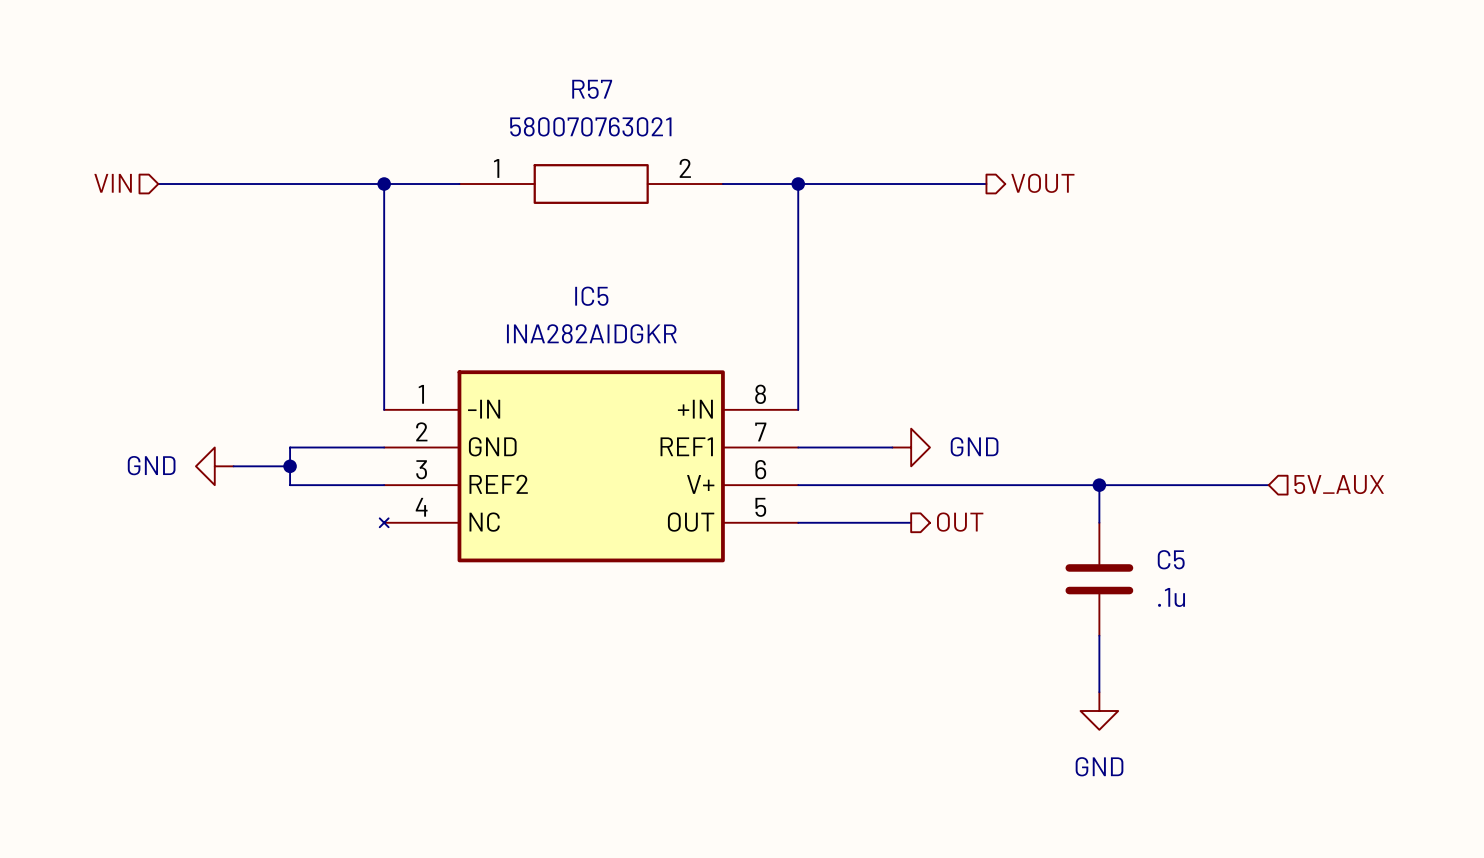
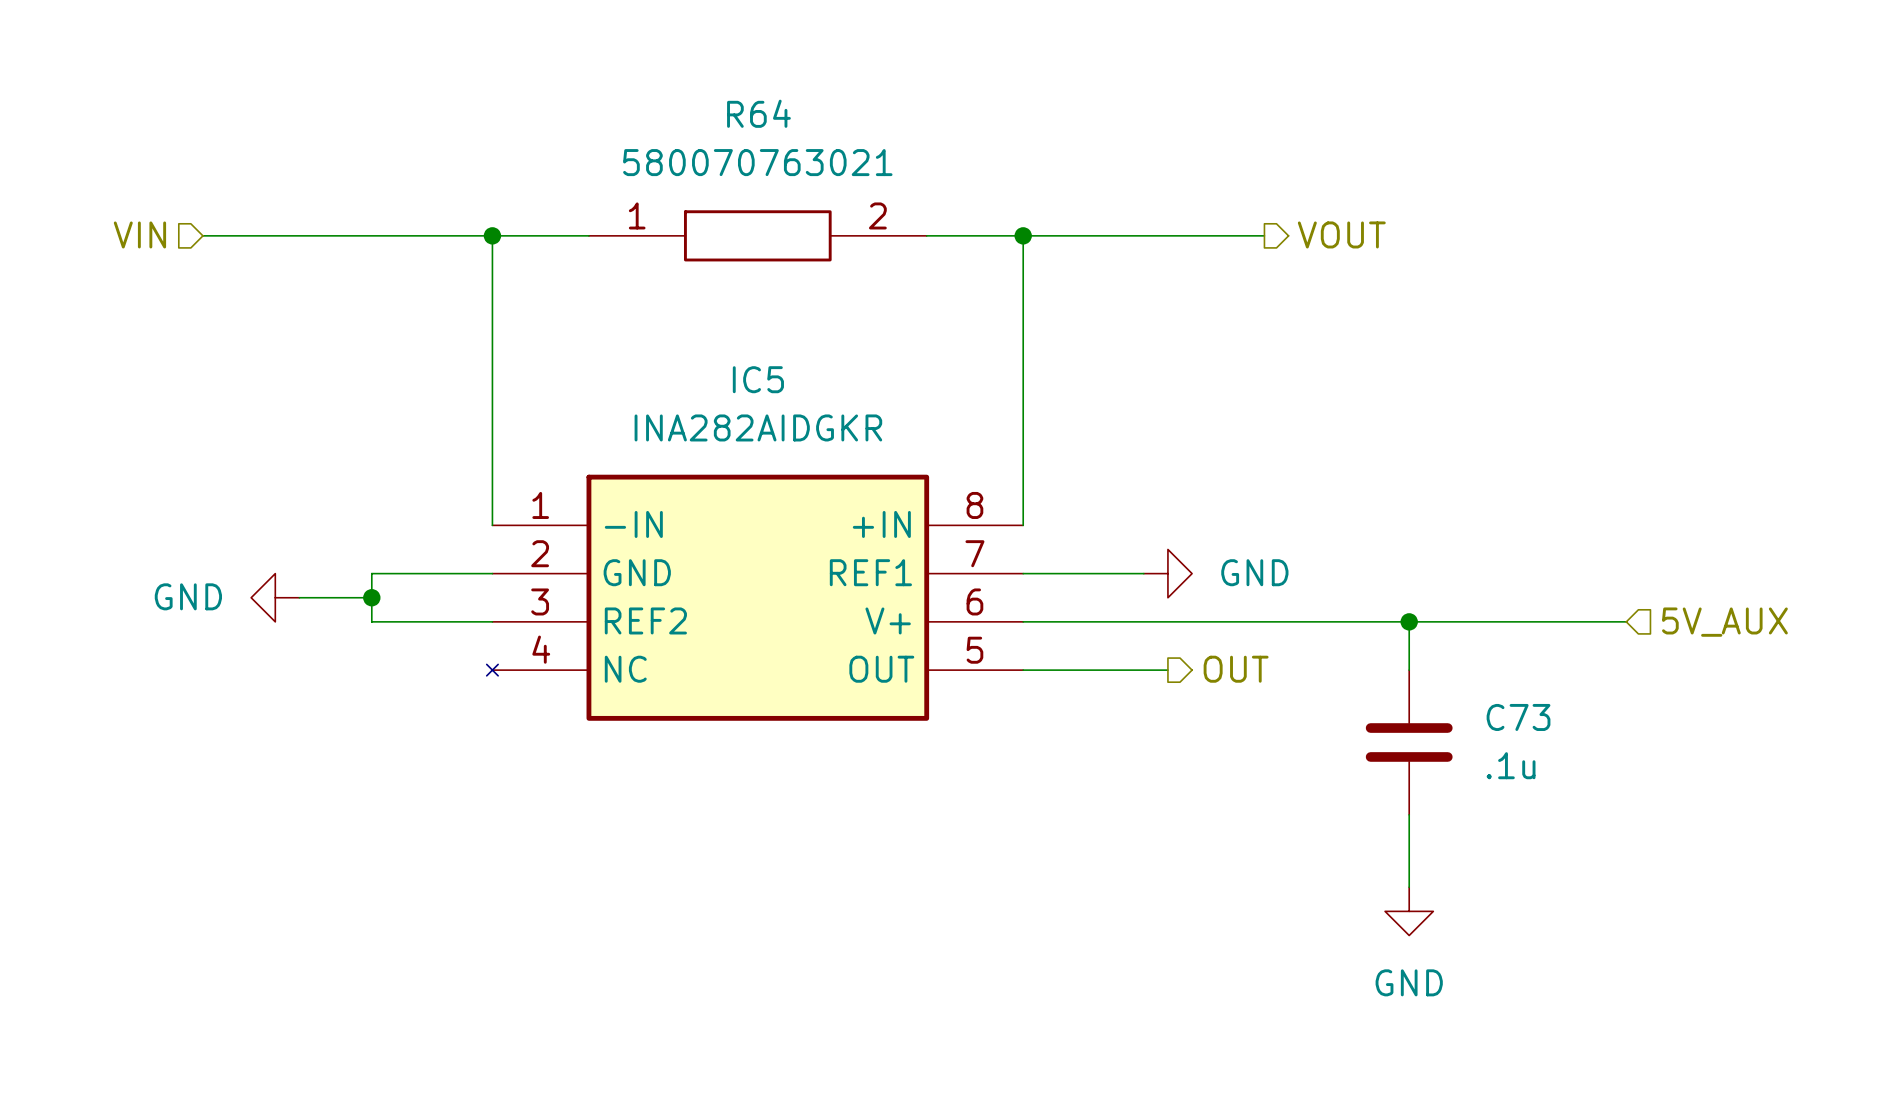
R57 name: R57 (592, 89) -> R64 (758, 113)
C5 name: C5 (1171, 559) -> C73 (1518, 717)

